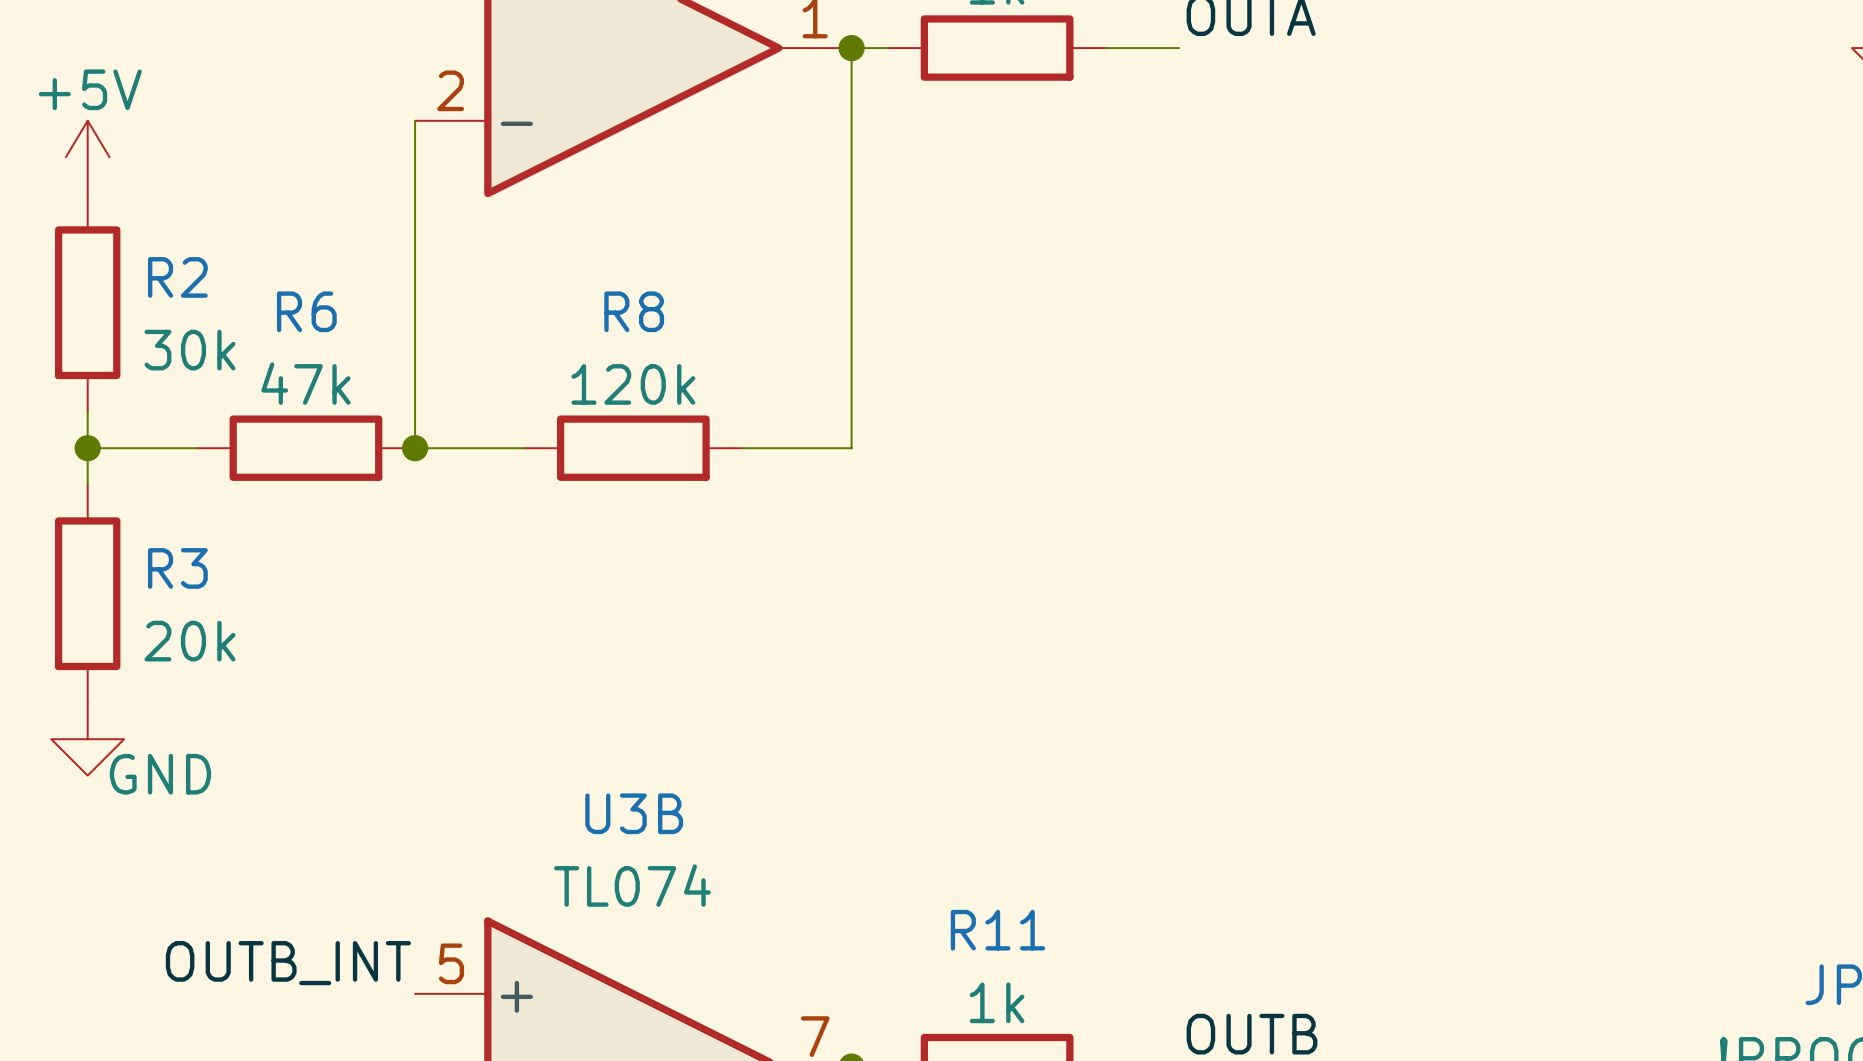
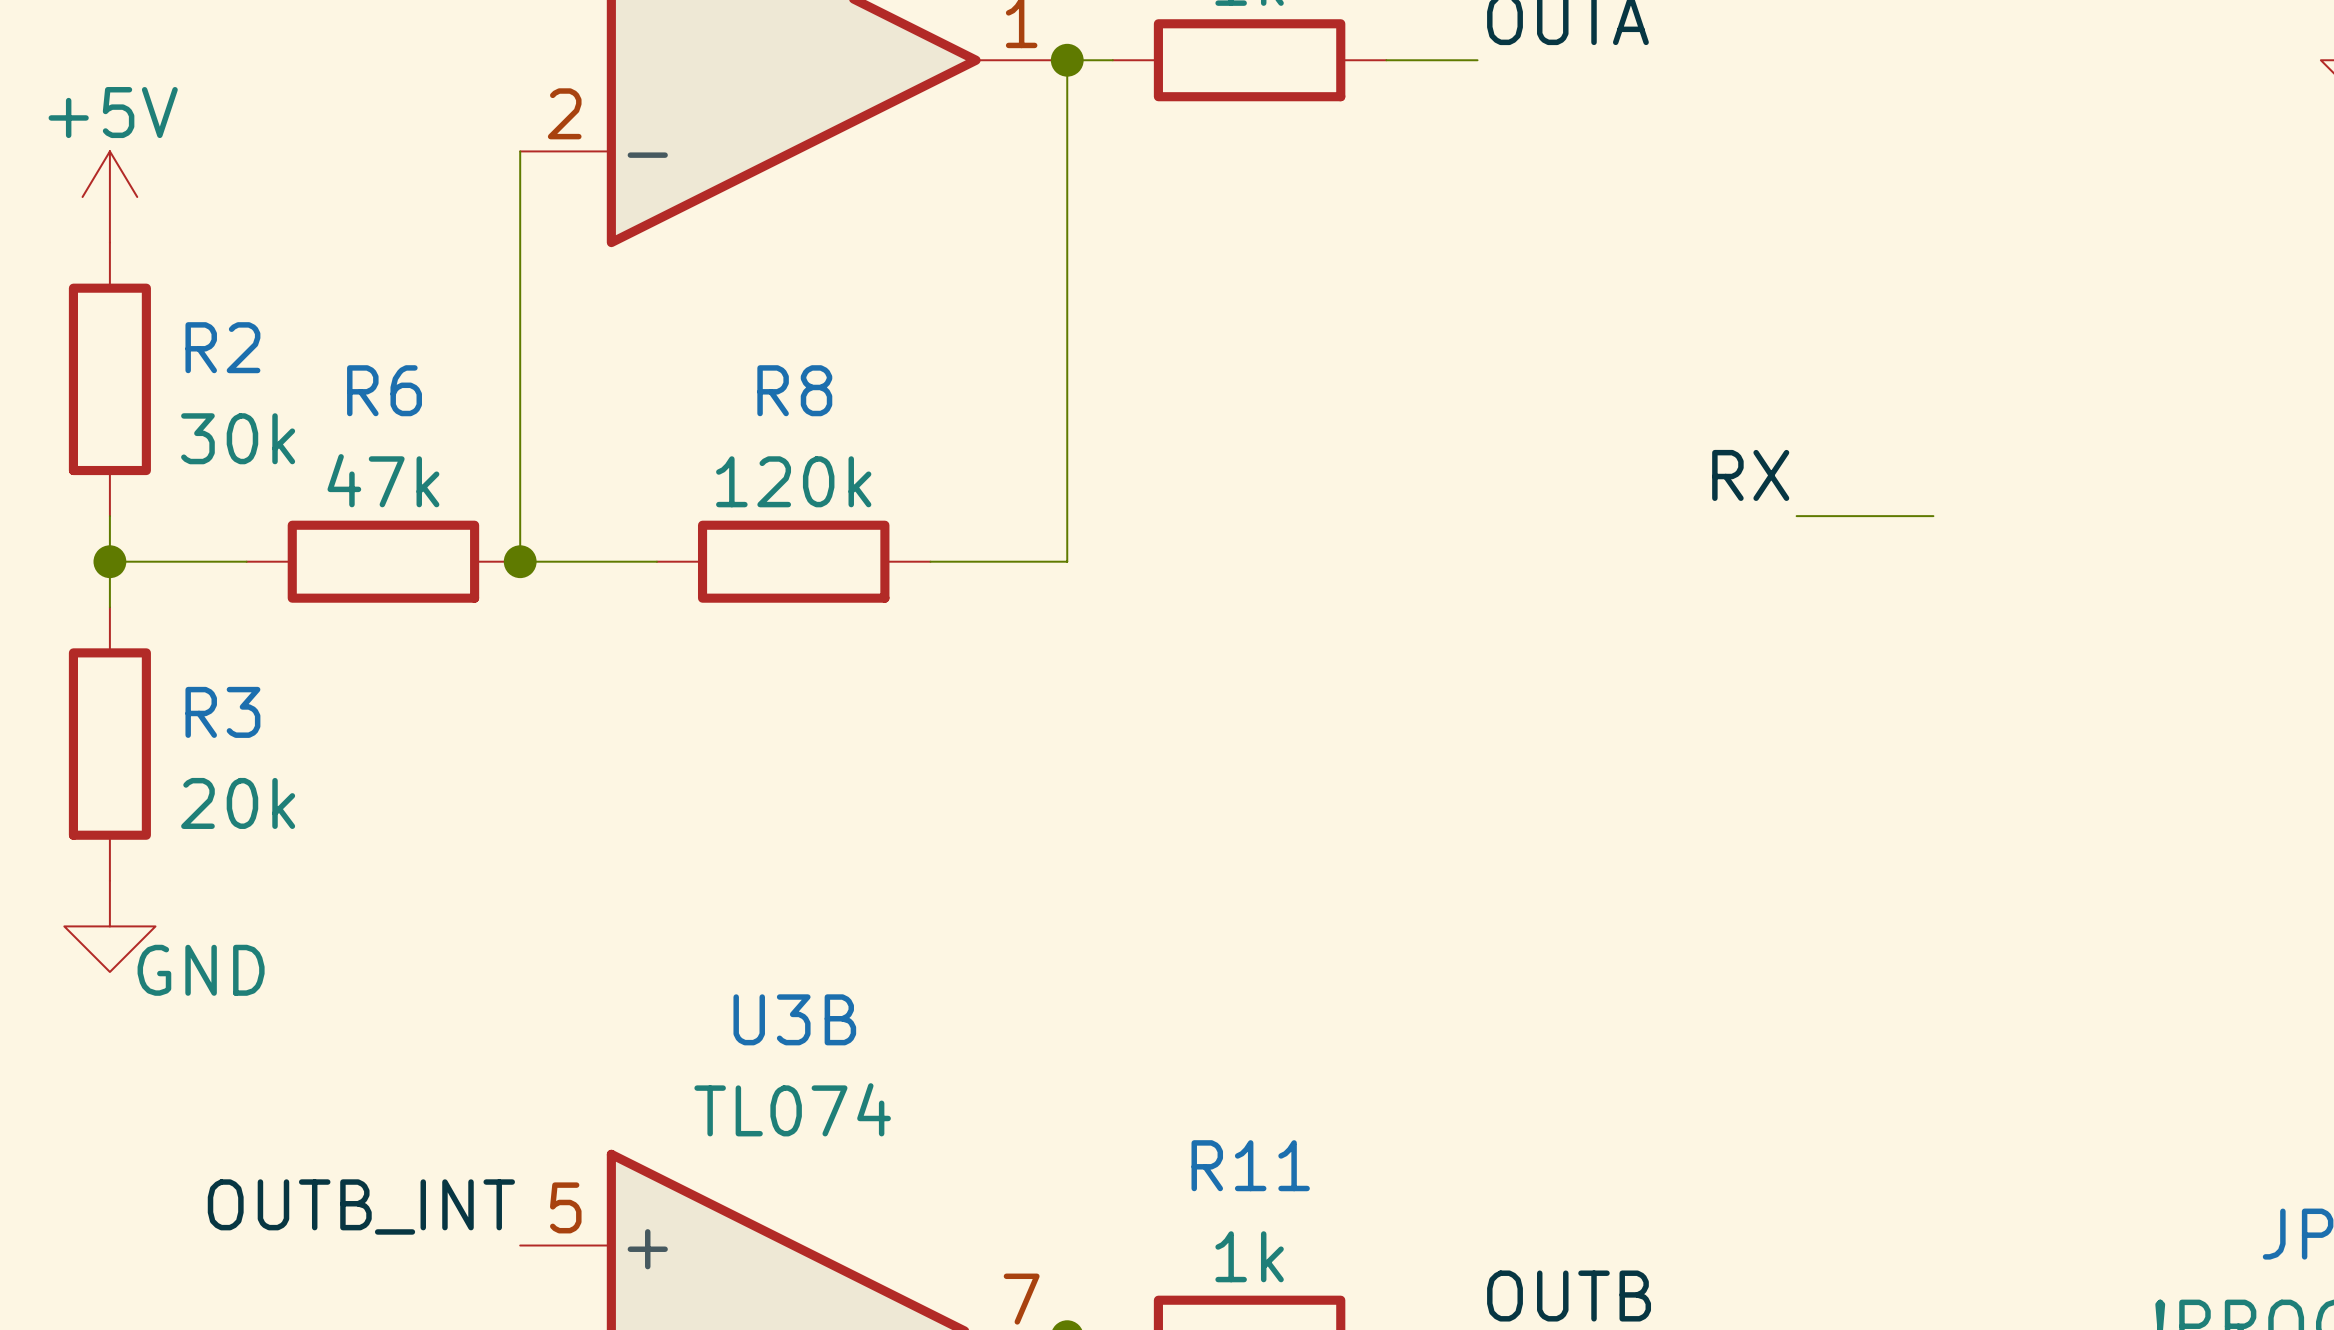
label: none -> RX (1750, 475)
wire: none -> (1796, 516) (1933, 516)

